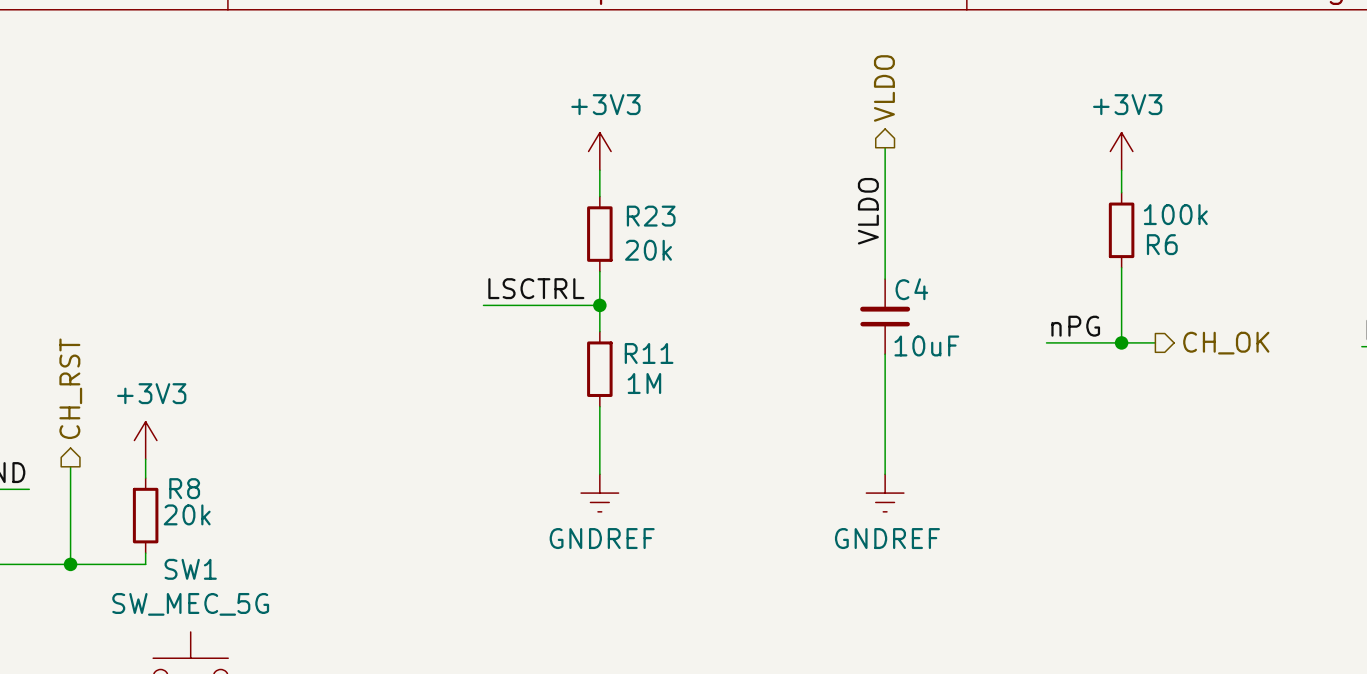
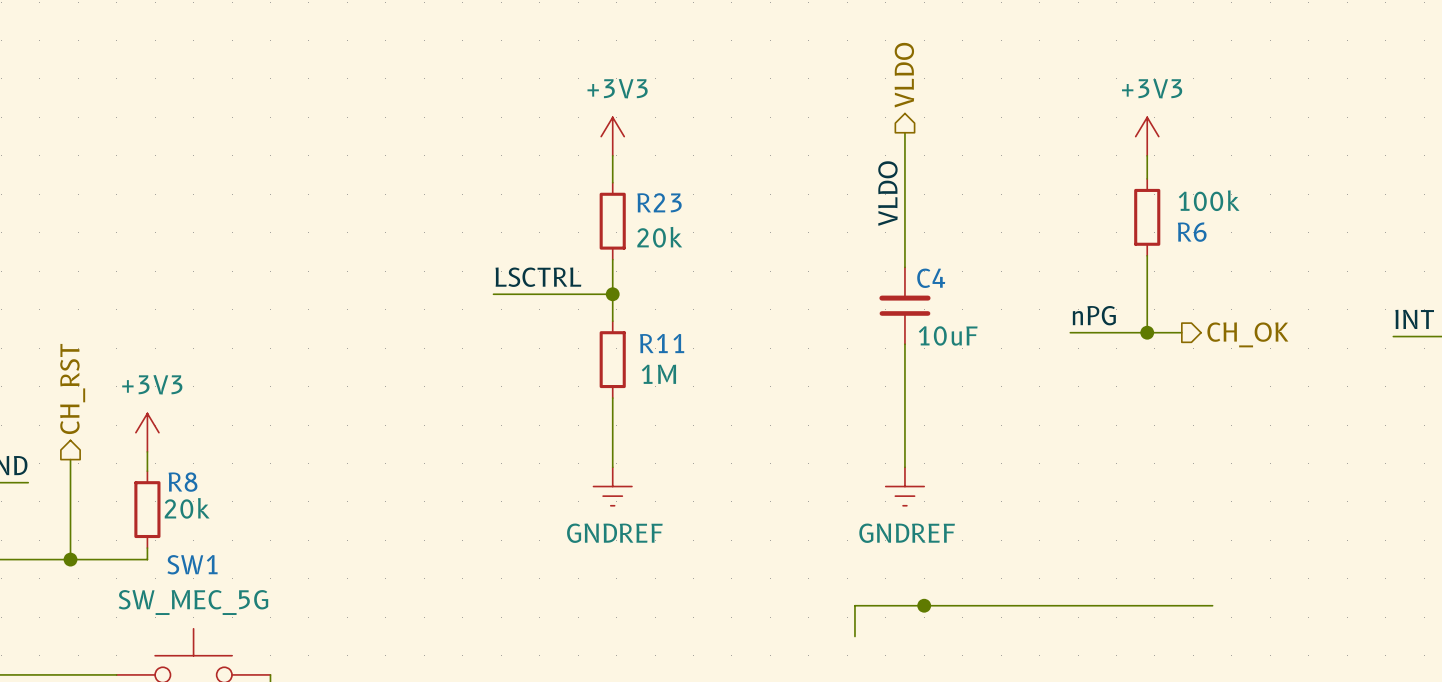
junction: none -> (924, 605)
wire: none -> (1212, 605) (854, 605) (854, 636)

